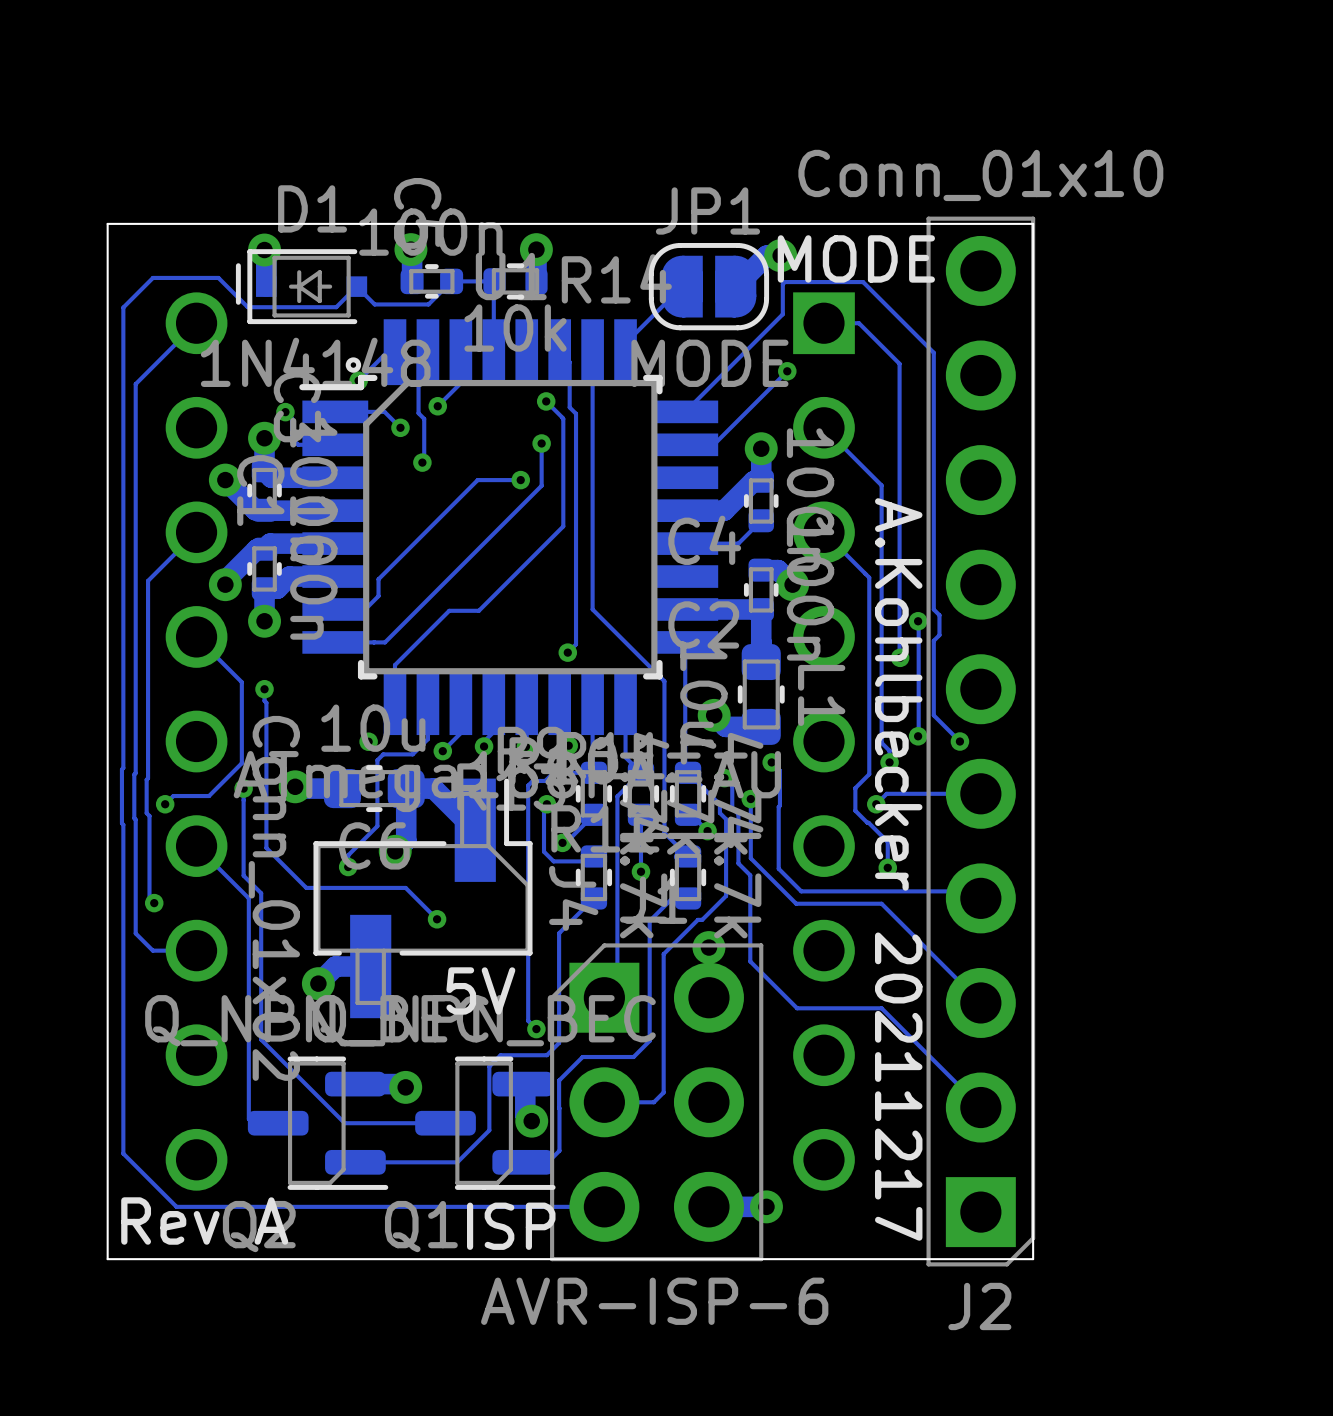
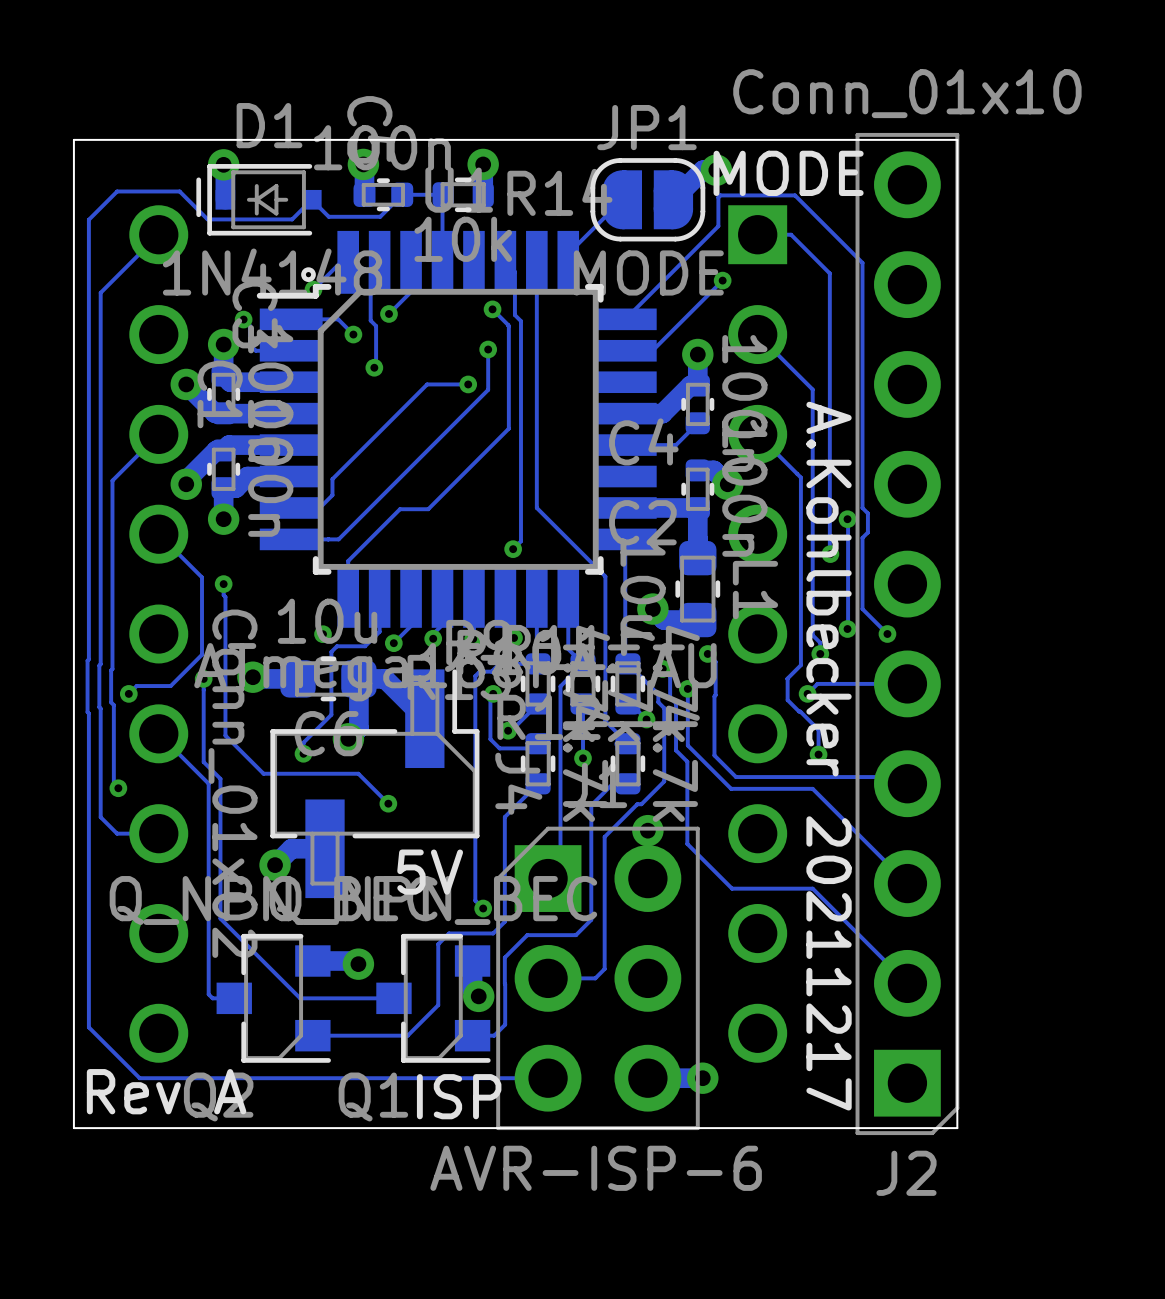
Q2 footprint: [247, 1056, 389, 1190] -> [216, 933, 331, 1063]
Q1 footprint: [415, 1056, 556, 1190] -> [376, 933, 491, 1063]

